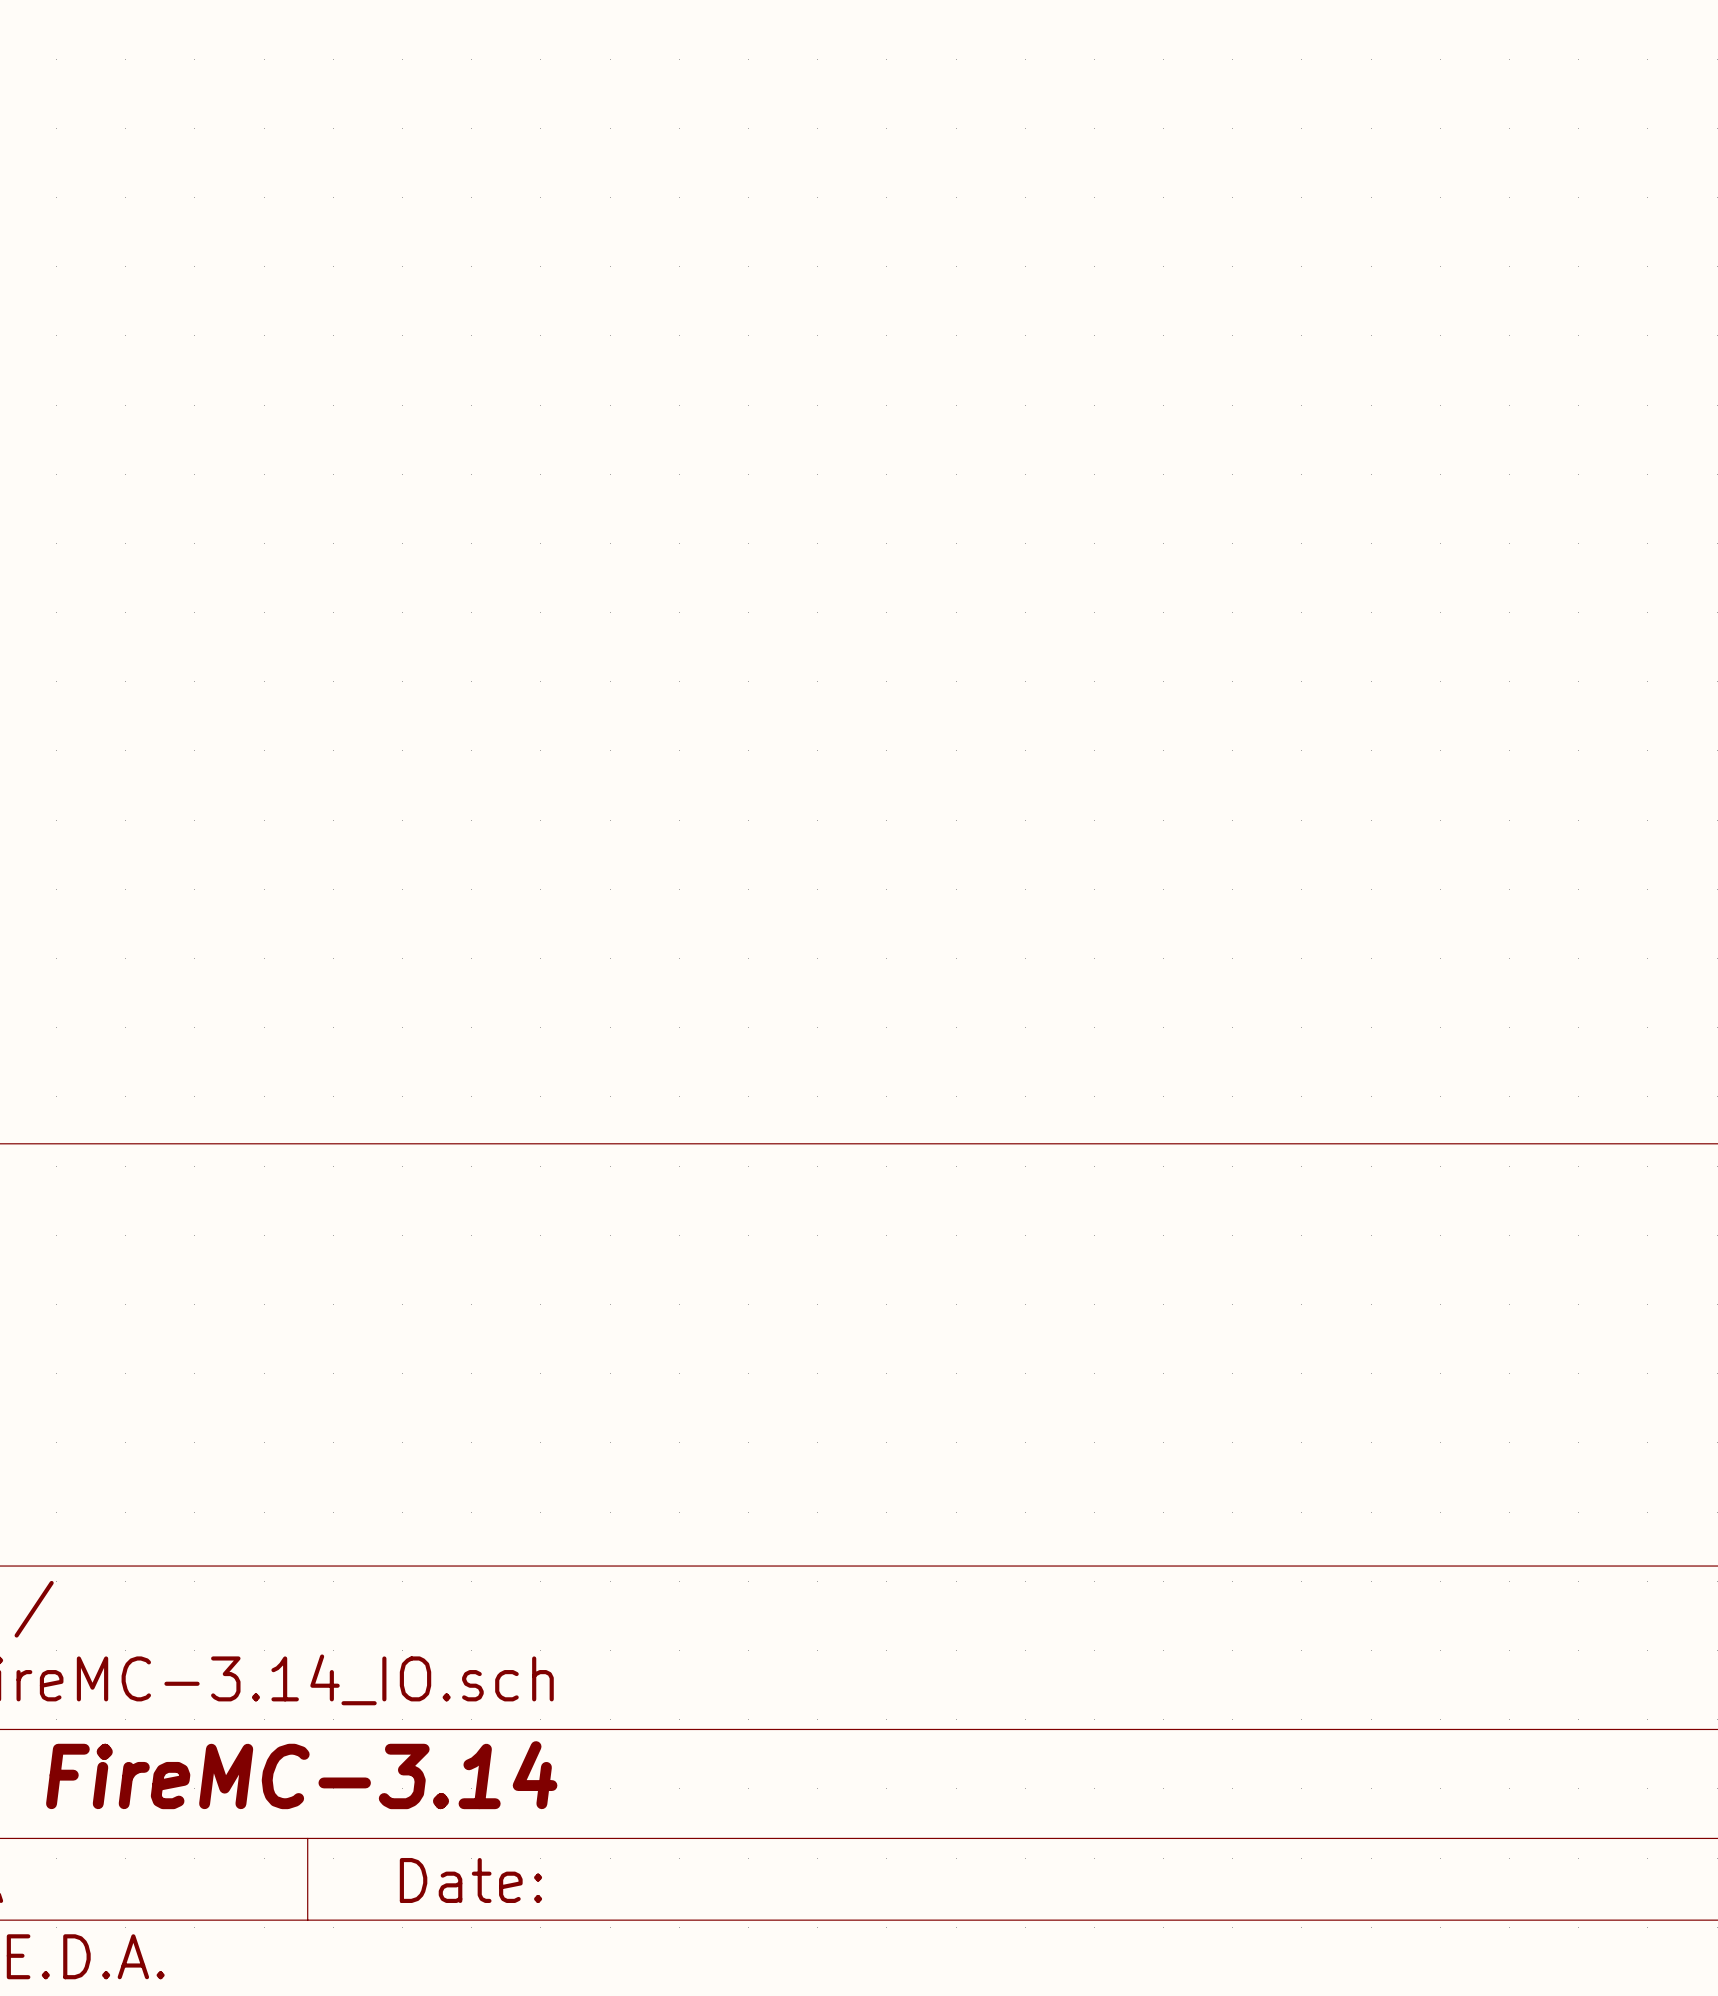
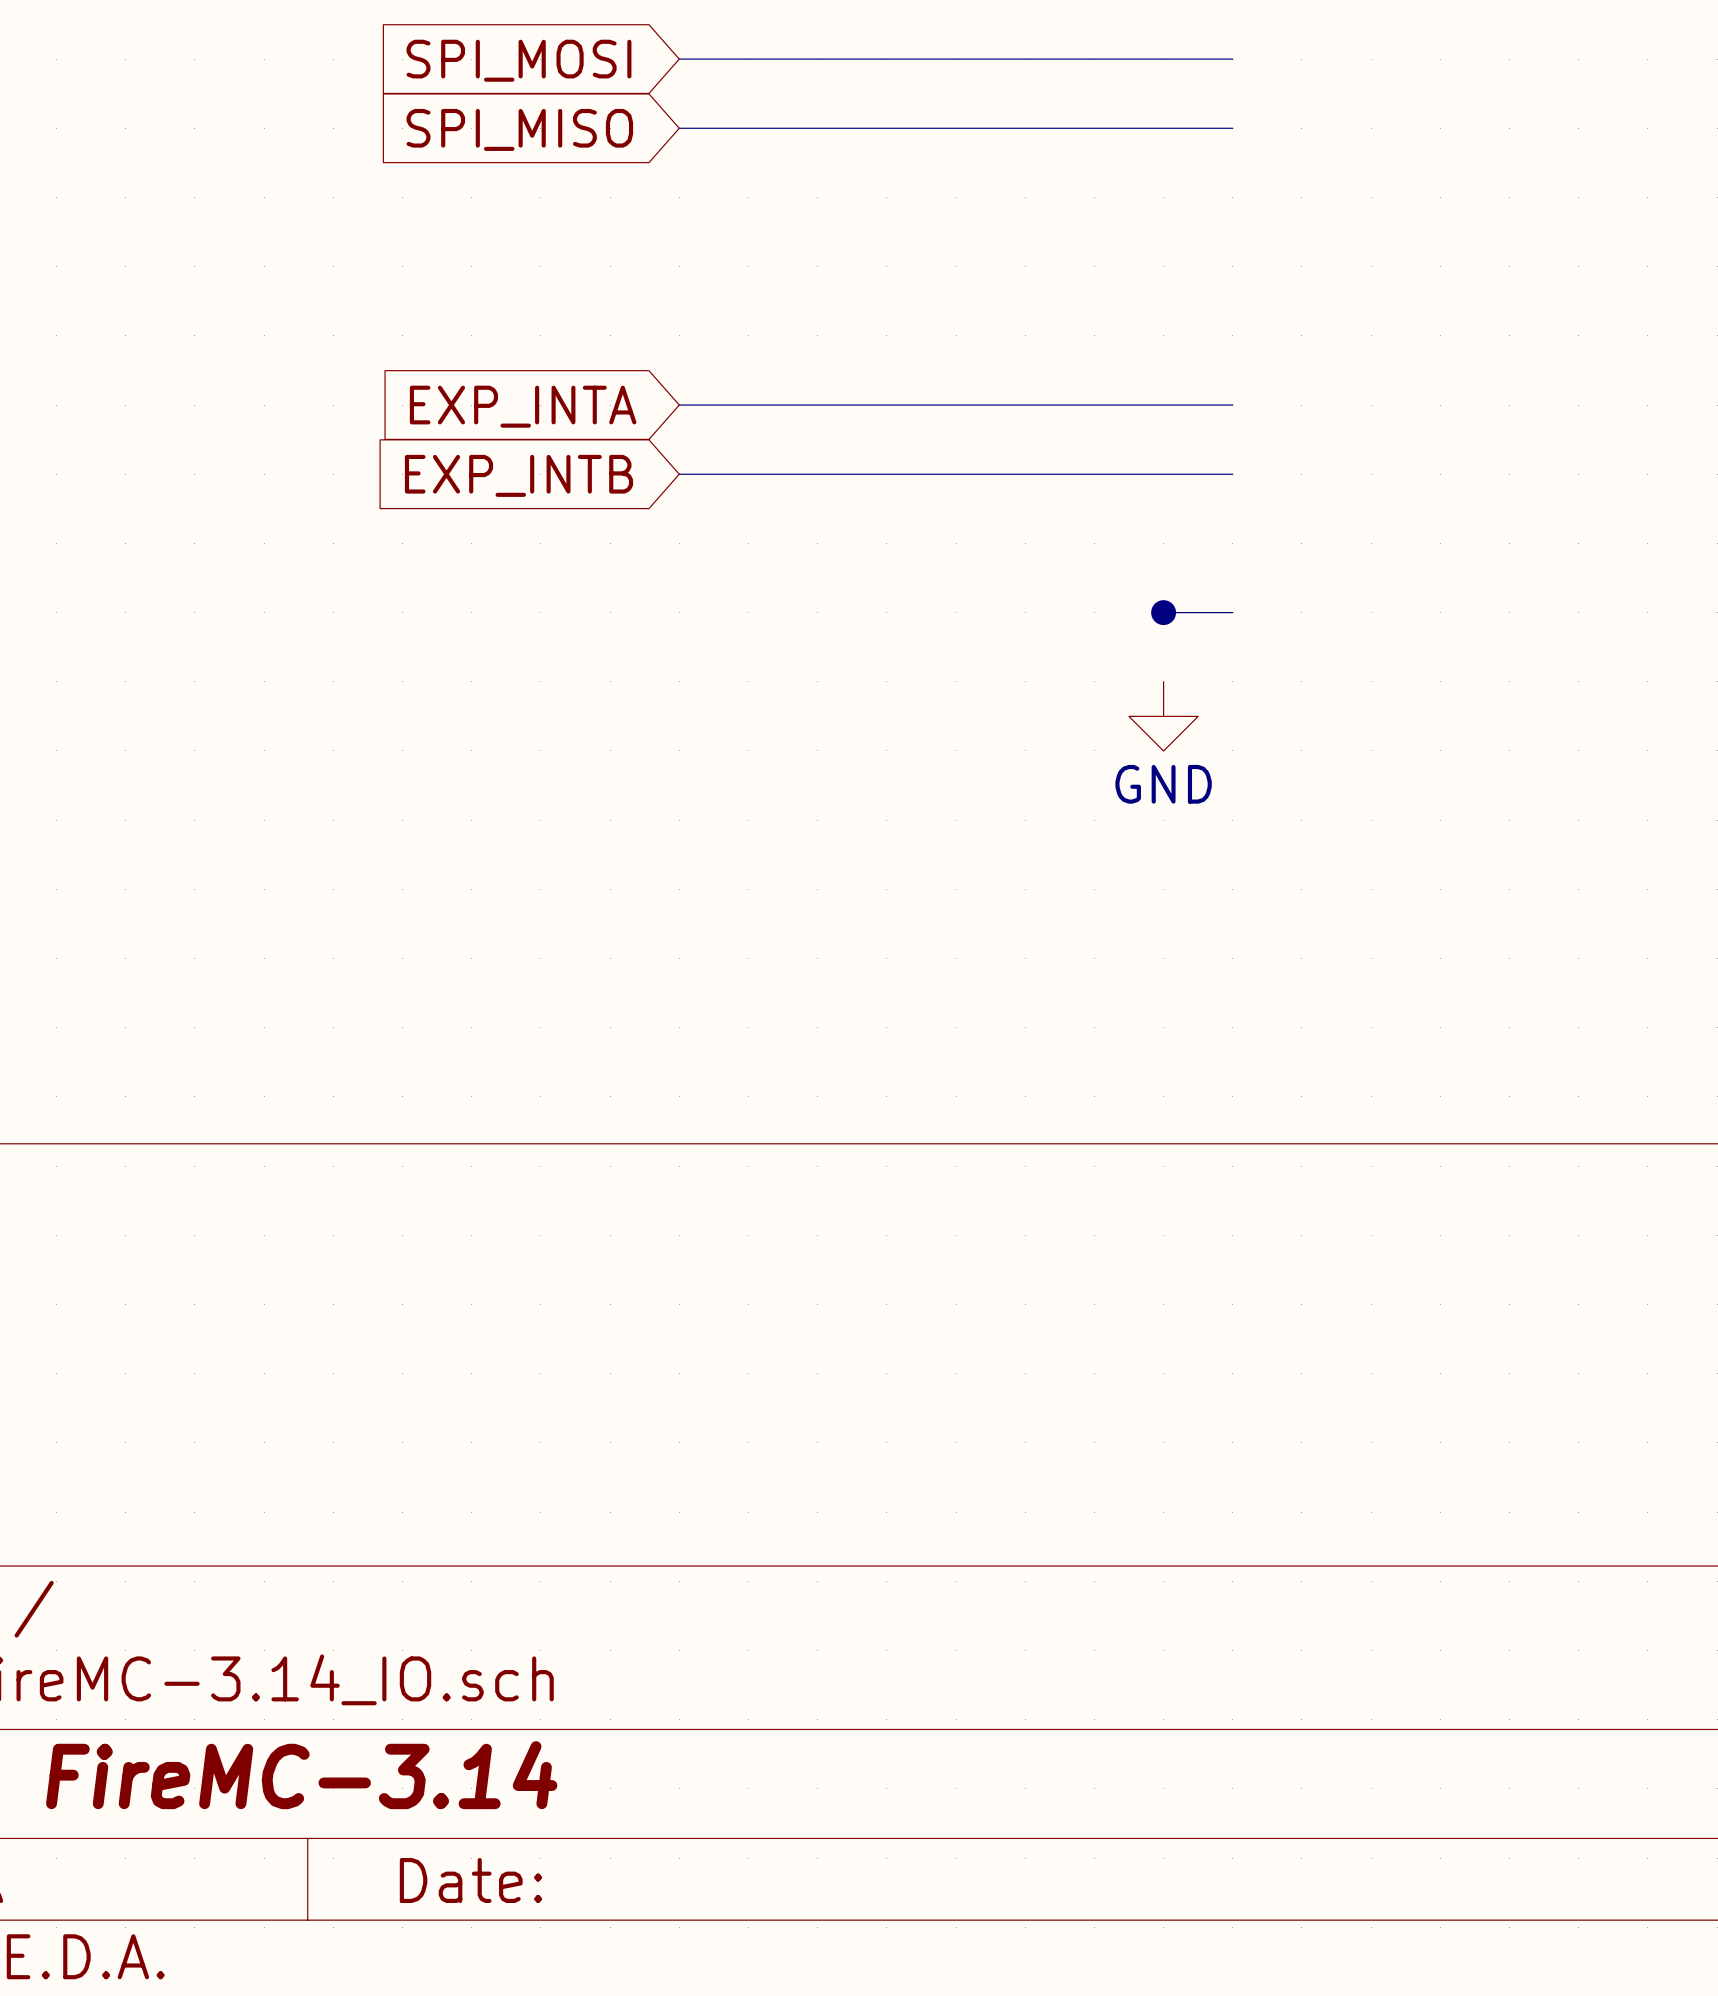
wire: none -> (679, 59) (1232, 59)
global label: none -> SPI_MOSI (519, 60)
wire: none -> (679, 128) (1232, 128)
global label: none -> SPI_MISO (519, 129)
wire: none -> (679, 405) (1232, 405)
global label: none -> EXP_INTA (523, 406)
wire: none -> (679, 474) (1232, 474)
global label: none -> EXP_INTB (519, 475)
wire: none -> (1163, 612) (1232, 612)
junction: none -> (1163, 612)
power symbol: none -> GND (1163, 716)

